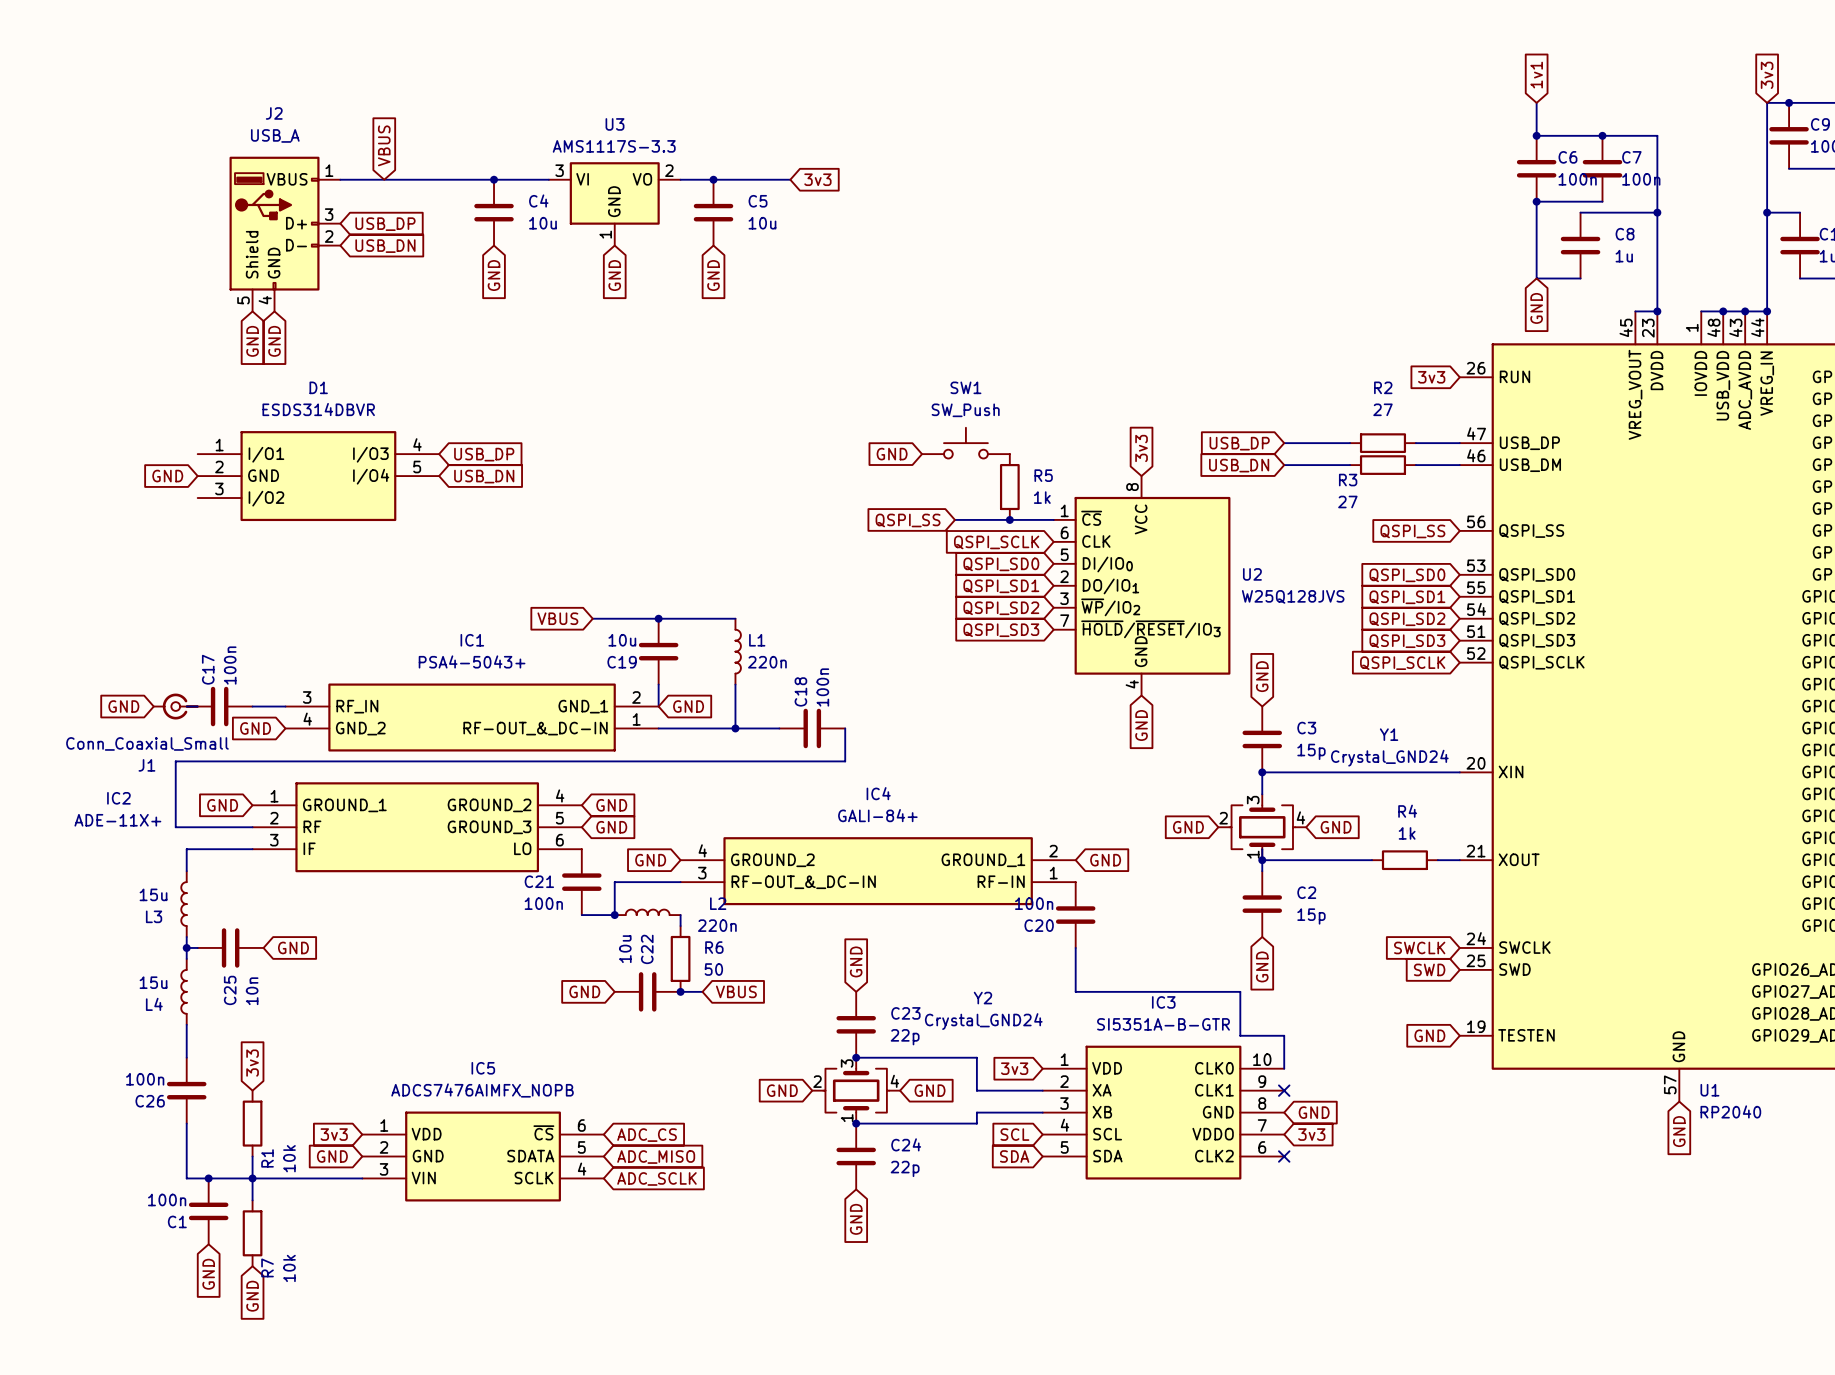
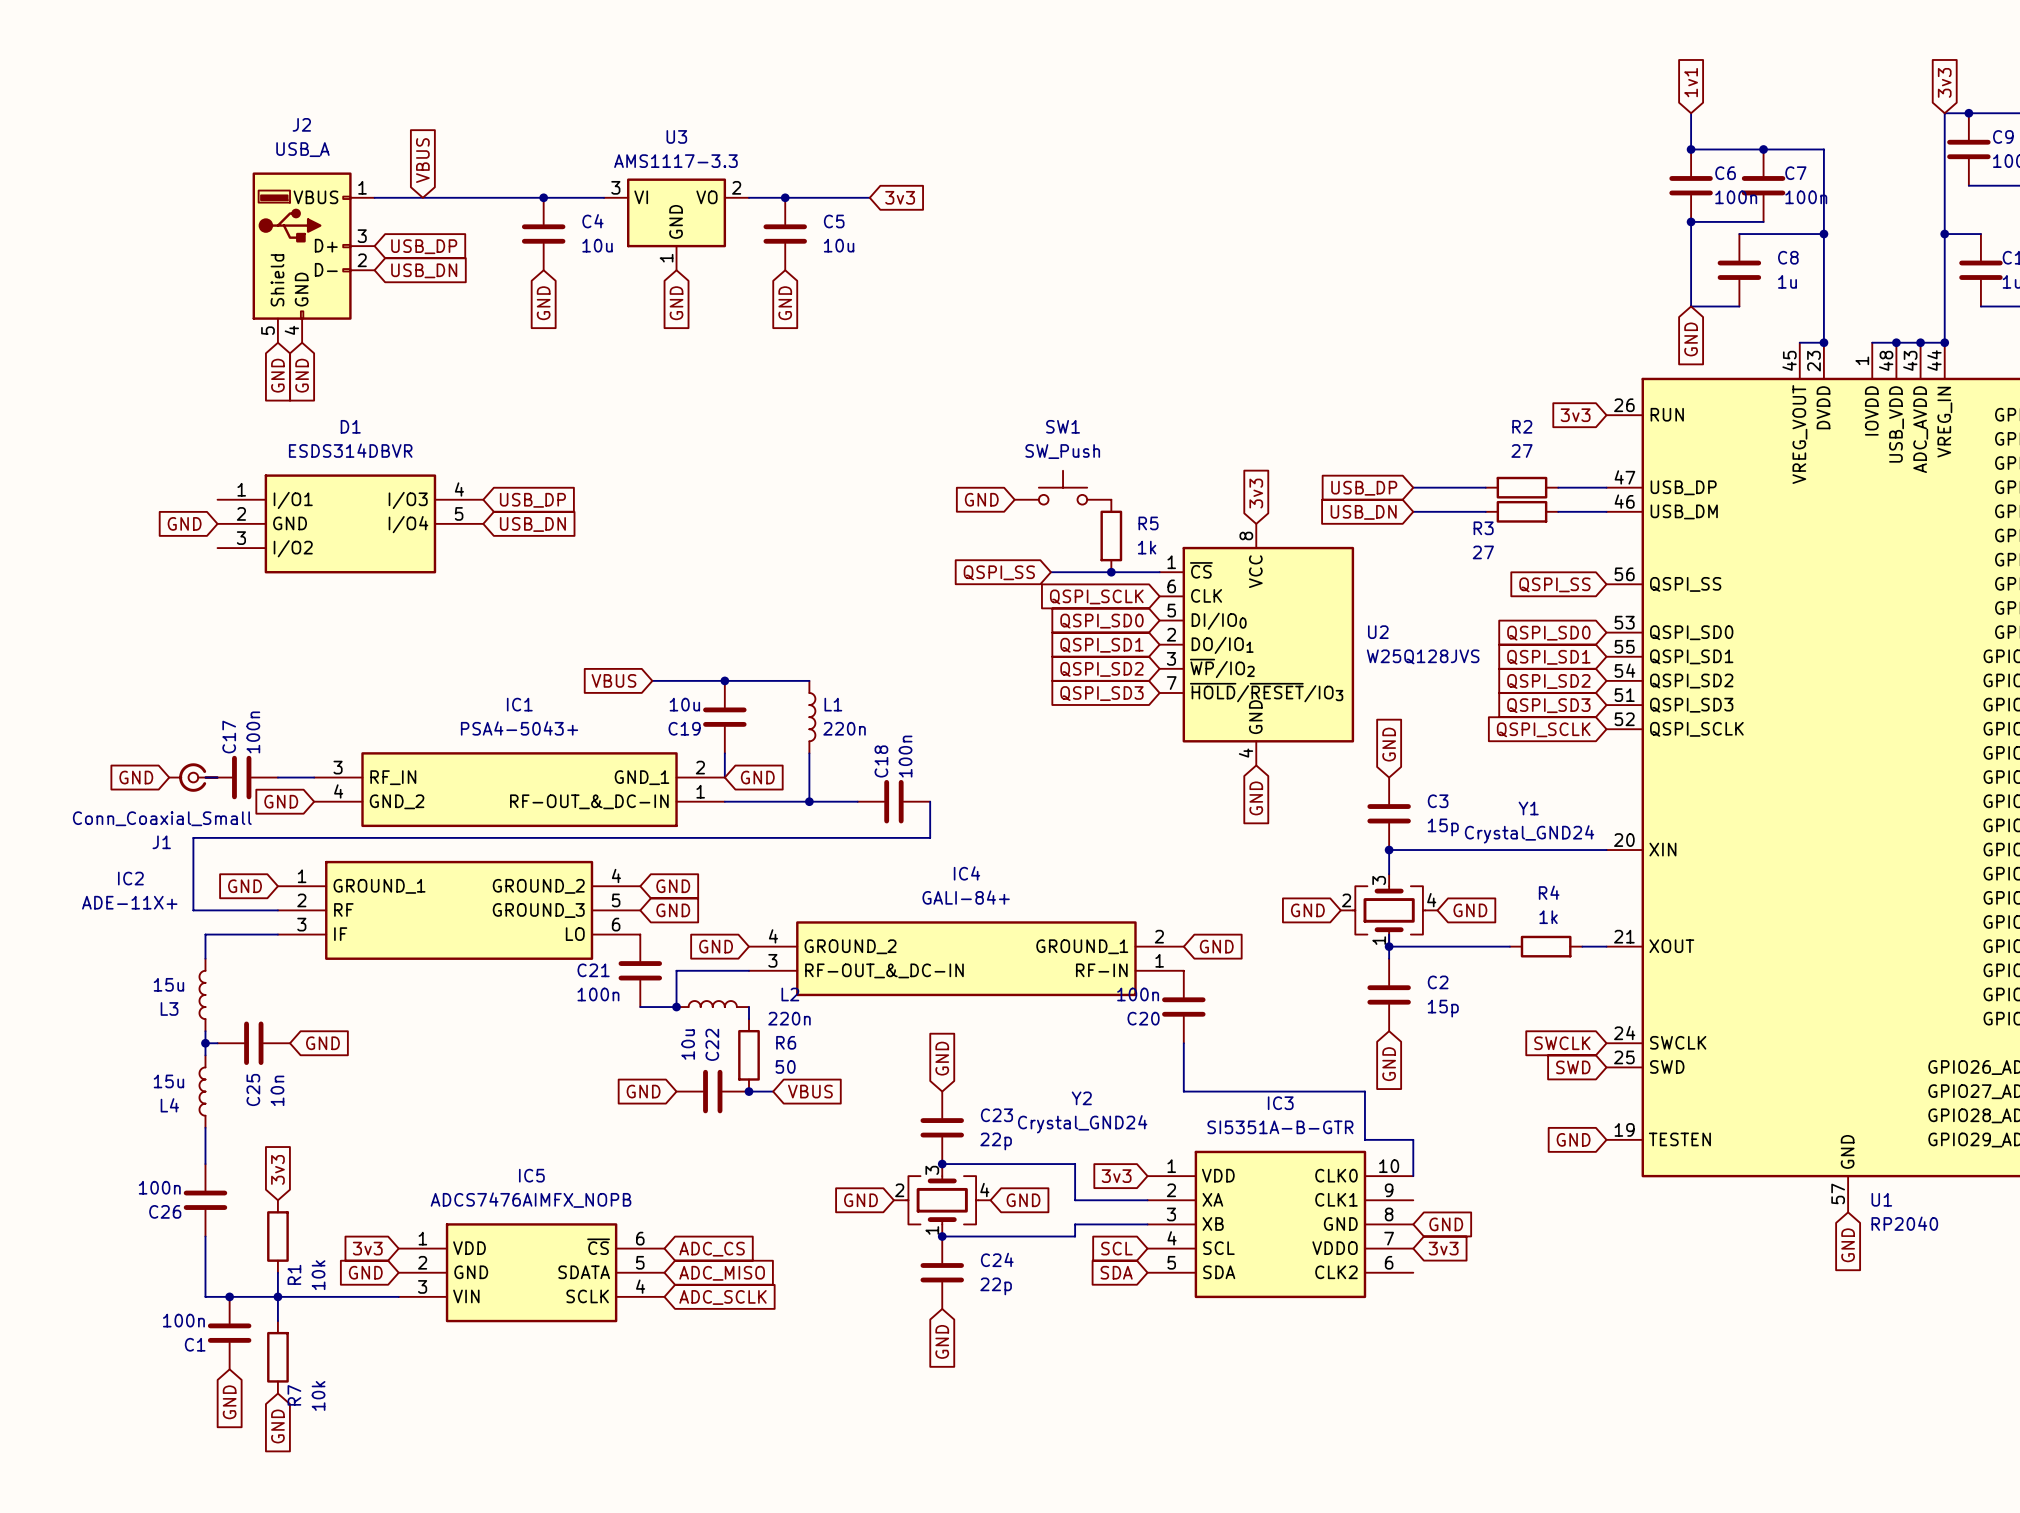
U3 value: AMS1117S-3.3 (614, 146) -> AMS1117-3.3 (675, 161)
no-connect mark: (1284, 1090) -> none
no-connect mark: (1284, 1156) -> none

